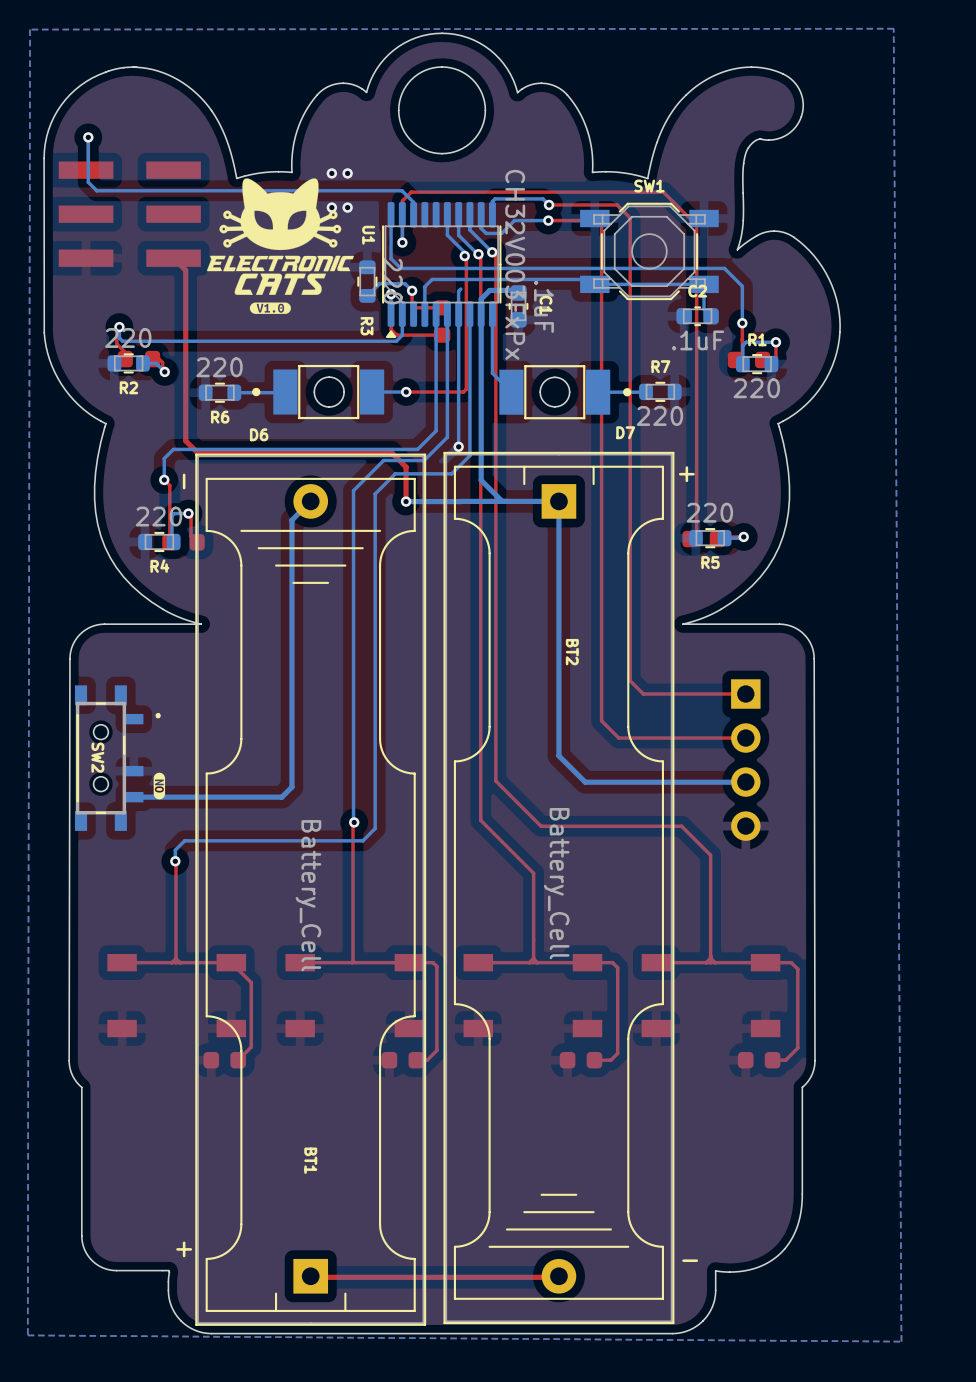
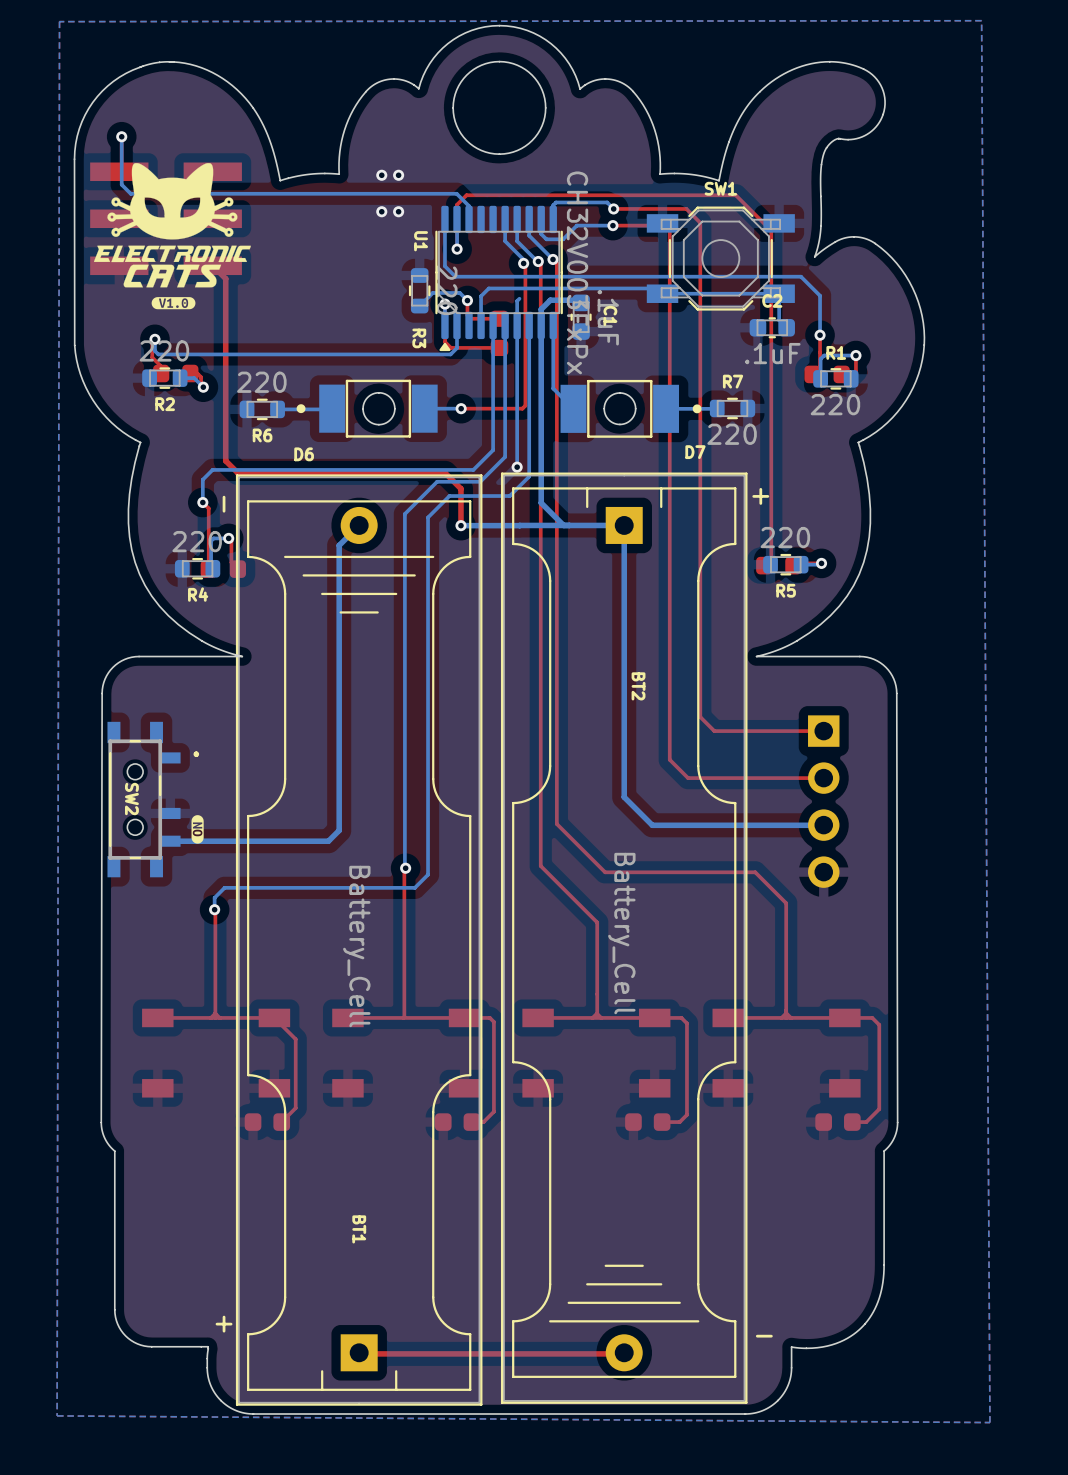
drawing position: (280, 236) -> (172, 225)
drawing position: (270, 308) -> (173, 303)

